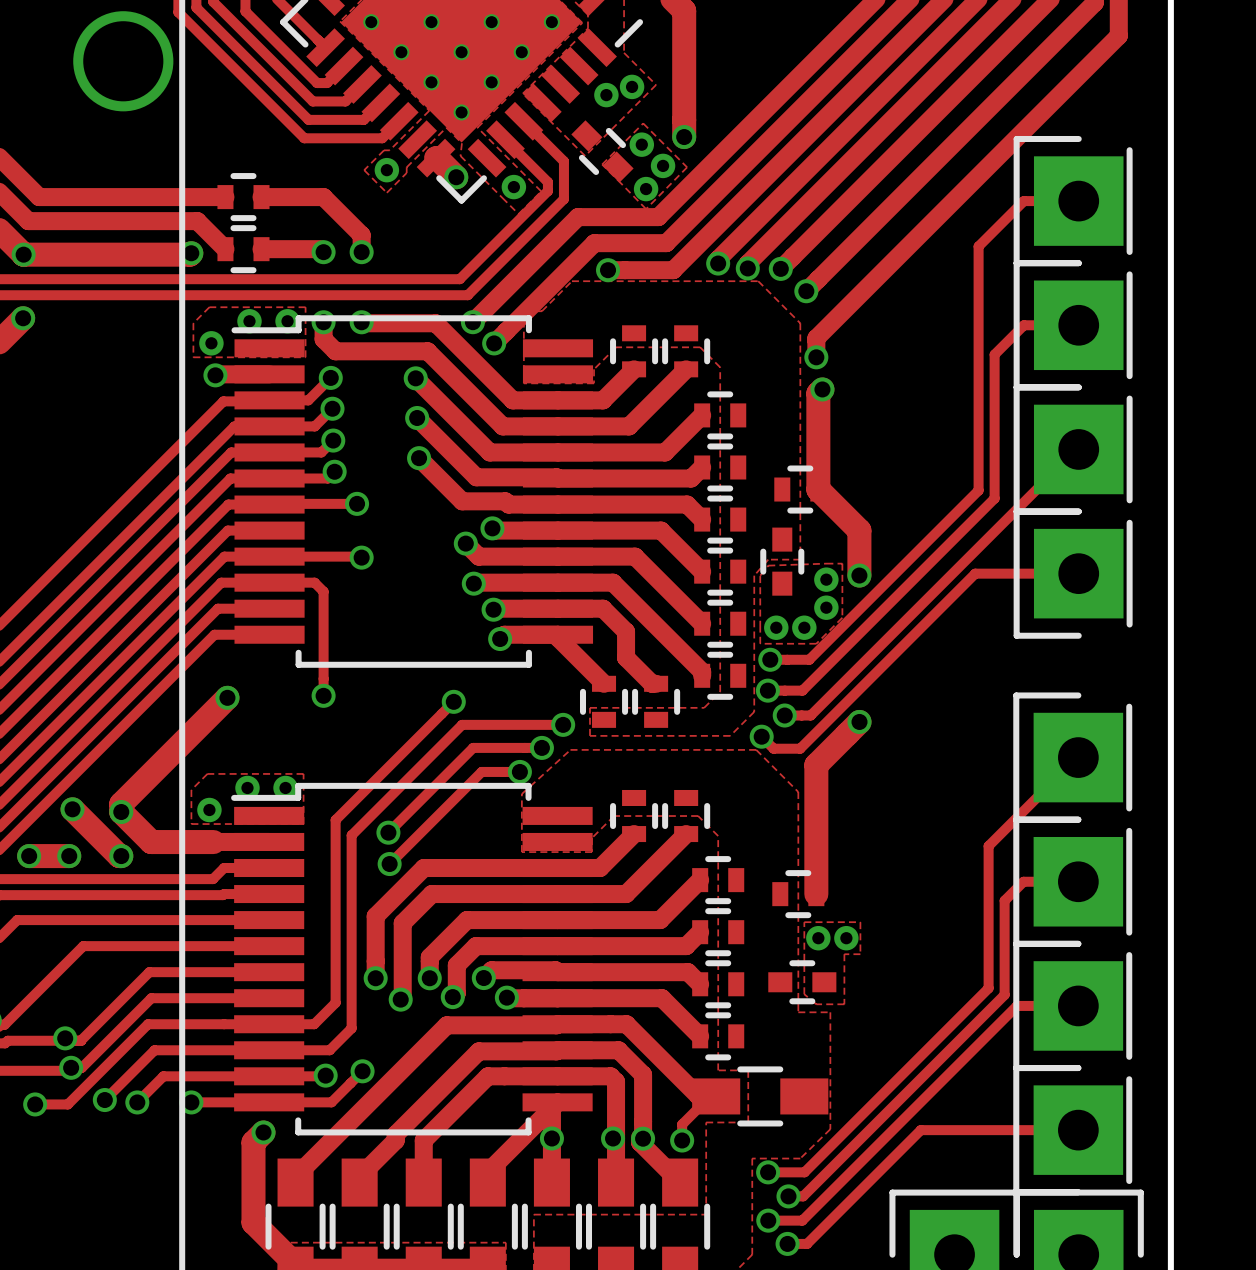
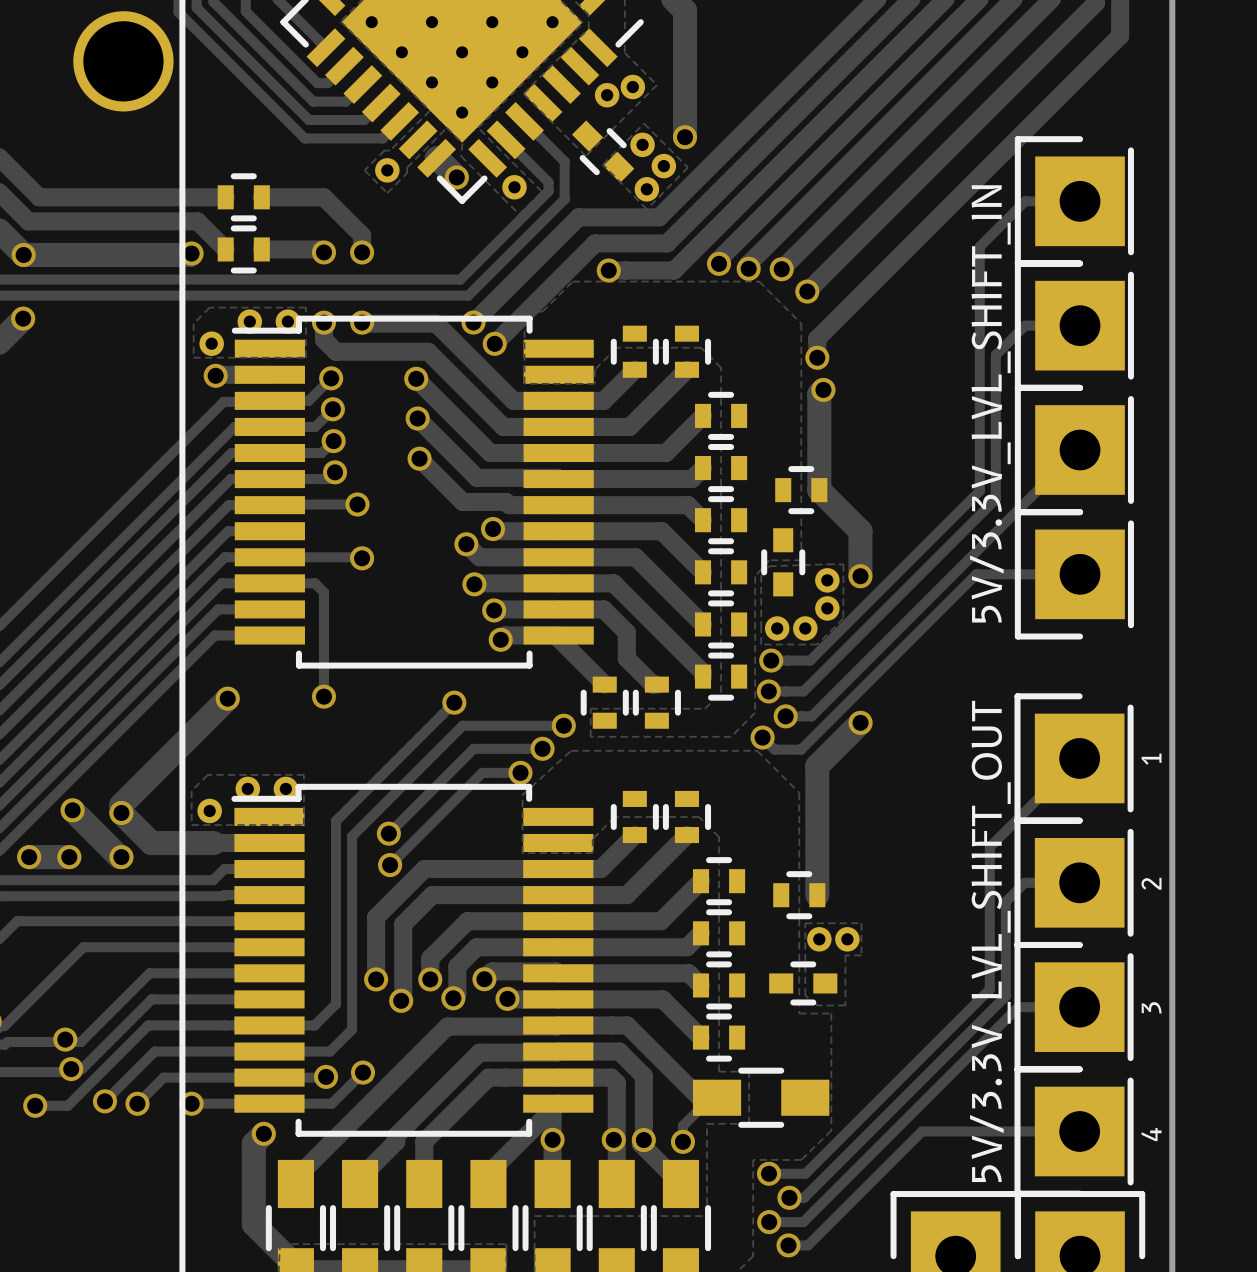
text: none -> 5V/3.3V_LVL_SHIFT_IN (990, 403)
text: none -> 1 (1151, 759)
text: none -> 2 (1151, 883)
text: none -> 5V/3.3V_LVL_SHIFT_OUT (990, 941)
text: none -> 3 (1151, 1007)
text: none -> 4 (1151, 1134)

